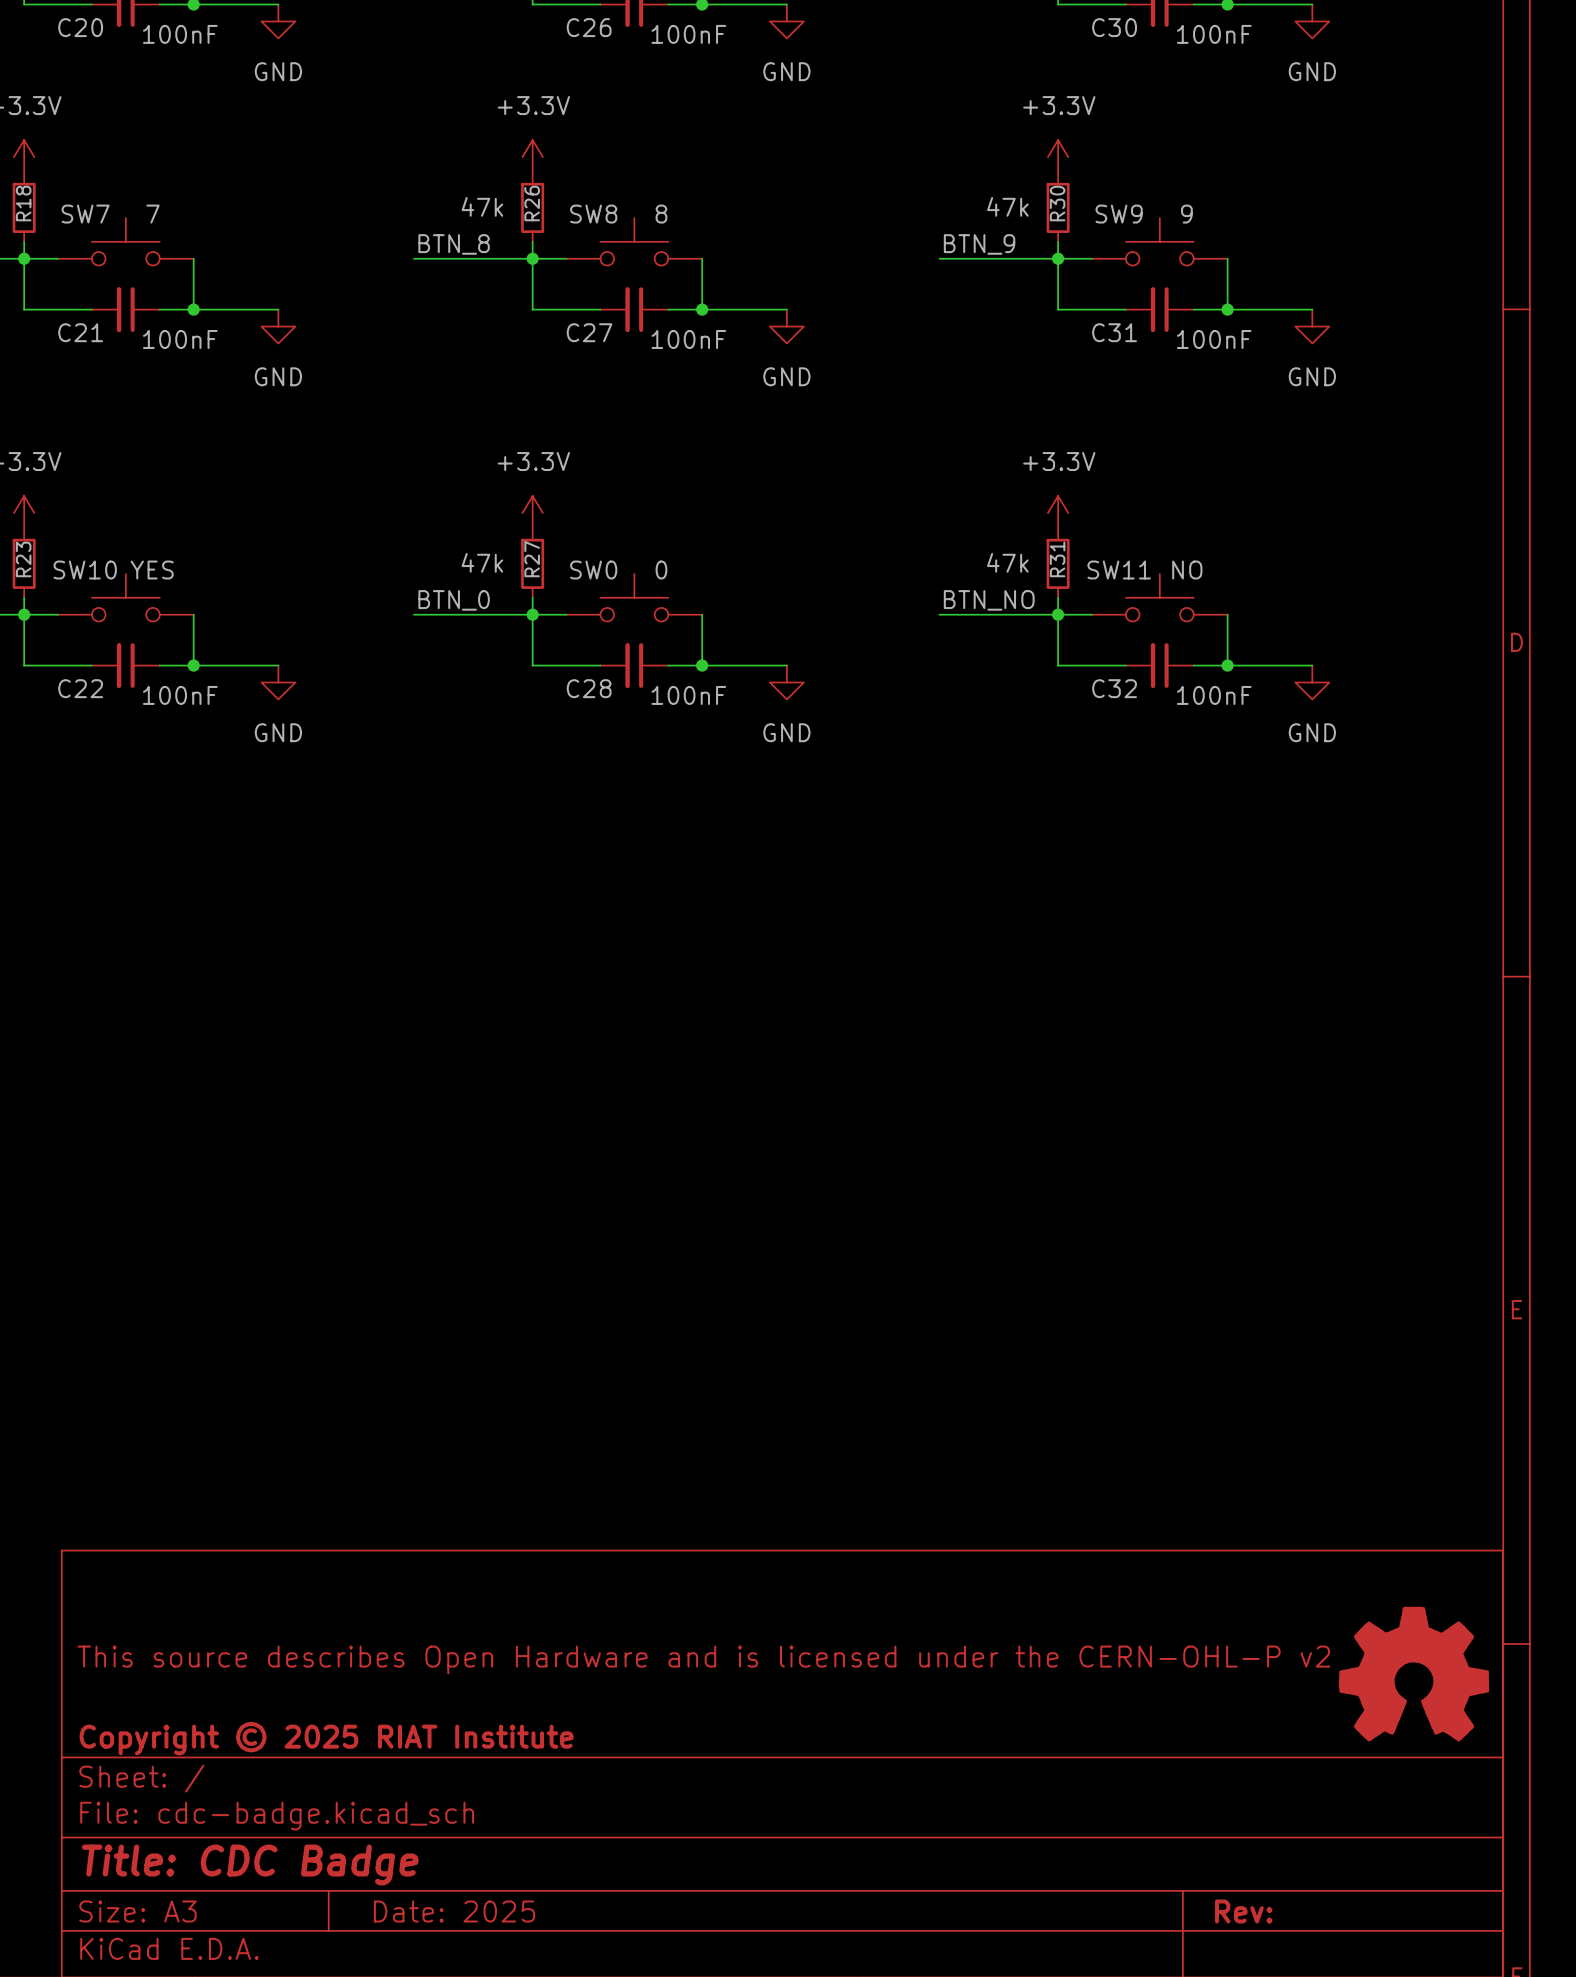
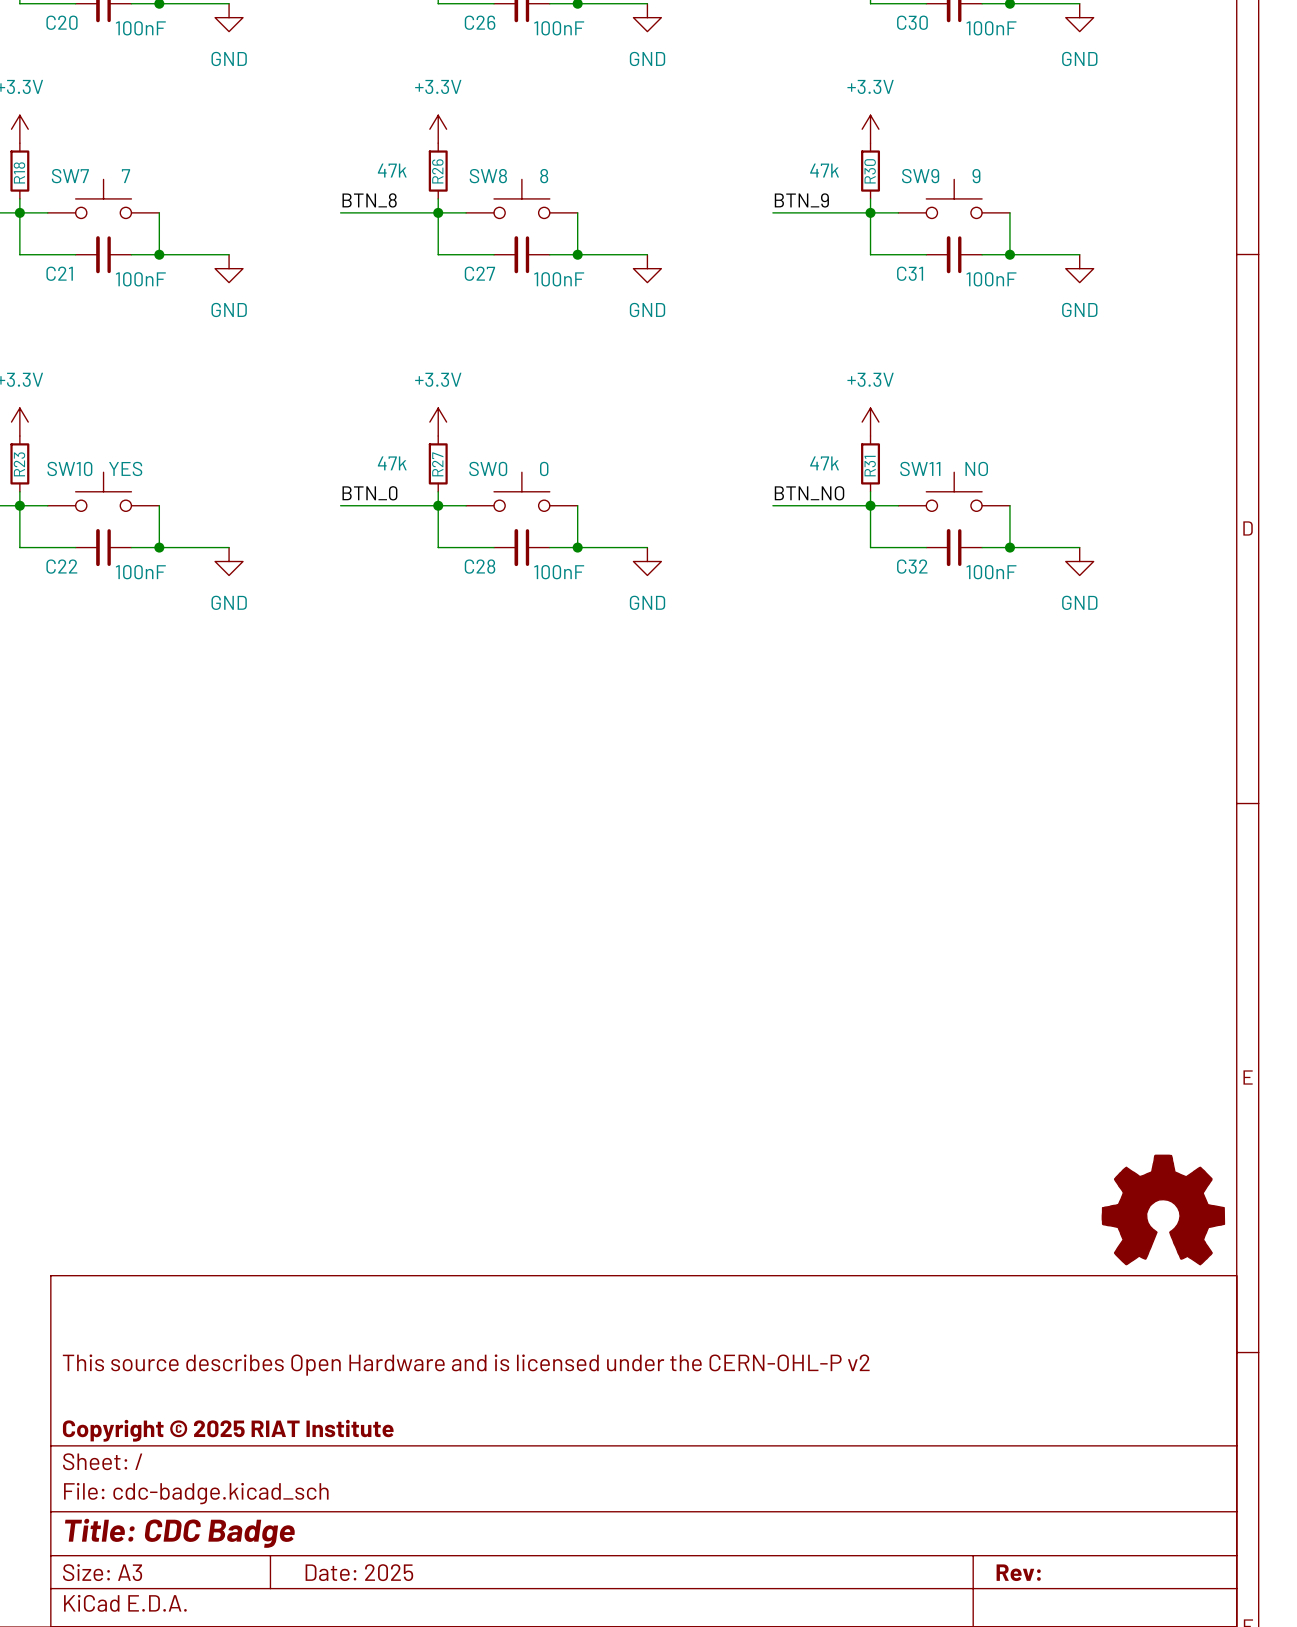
power symbol position: (1414, 1674) -> (1163, 1209)

